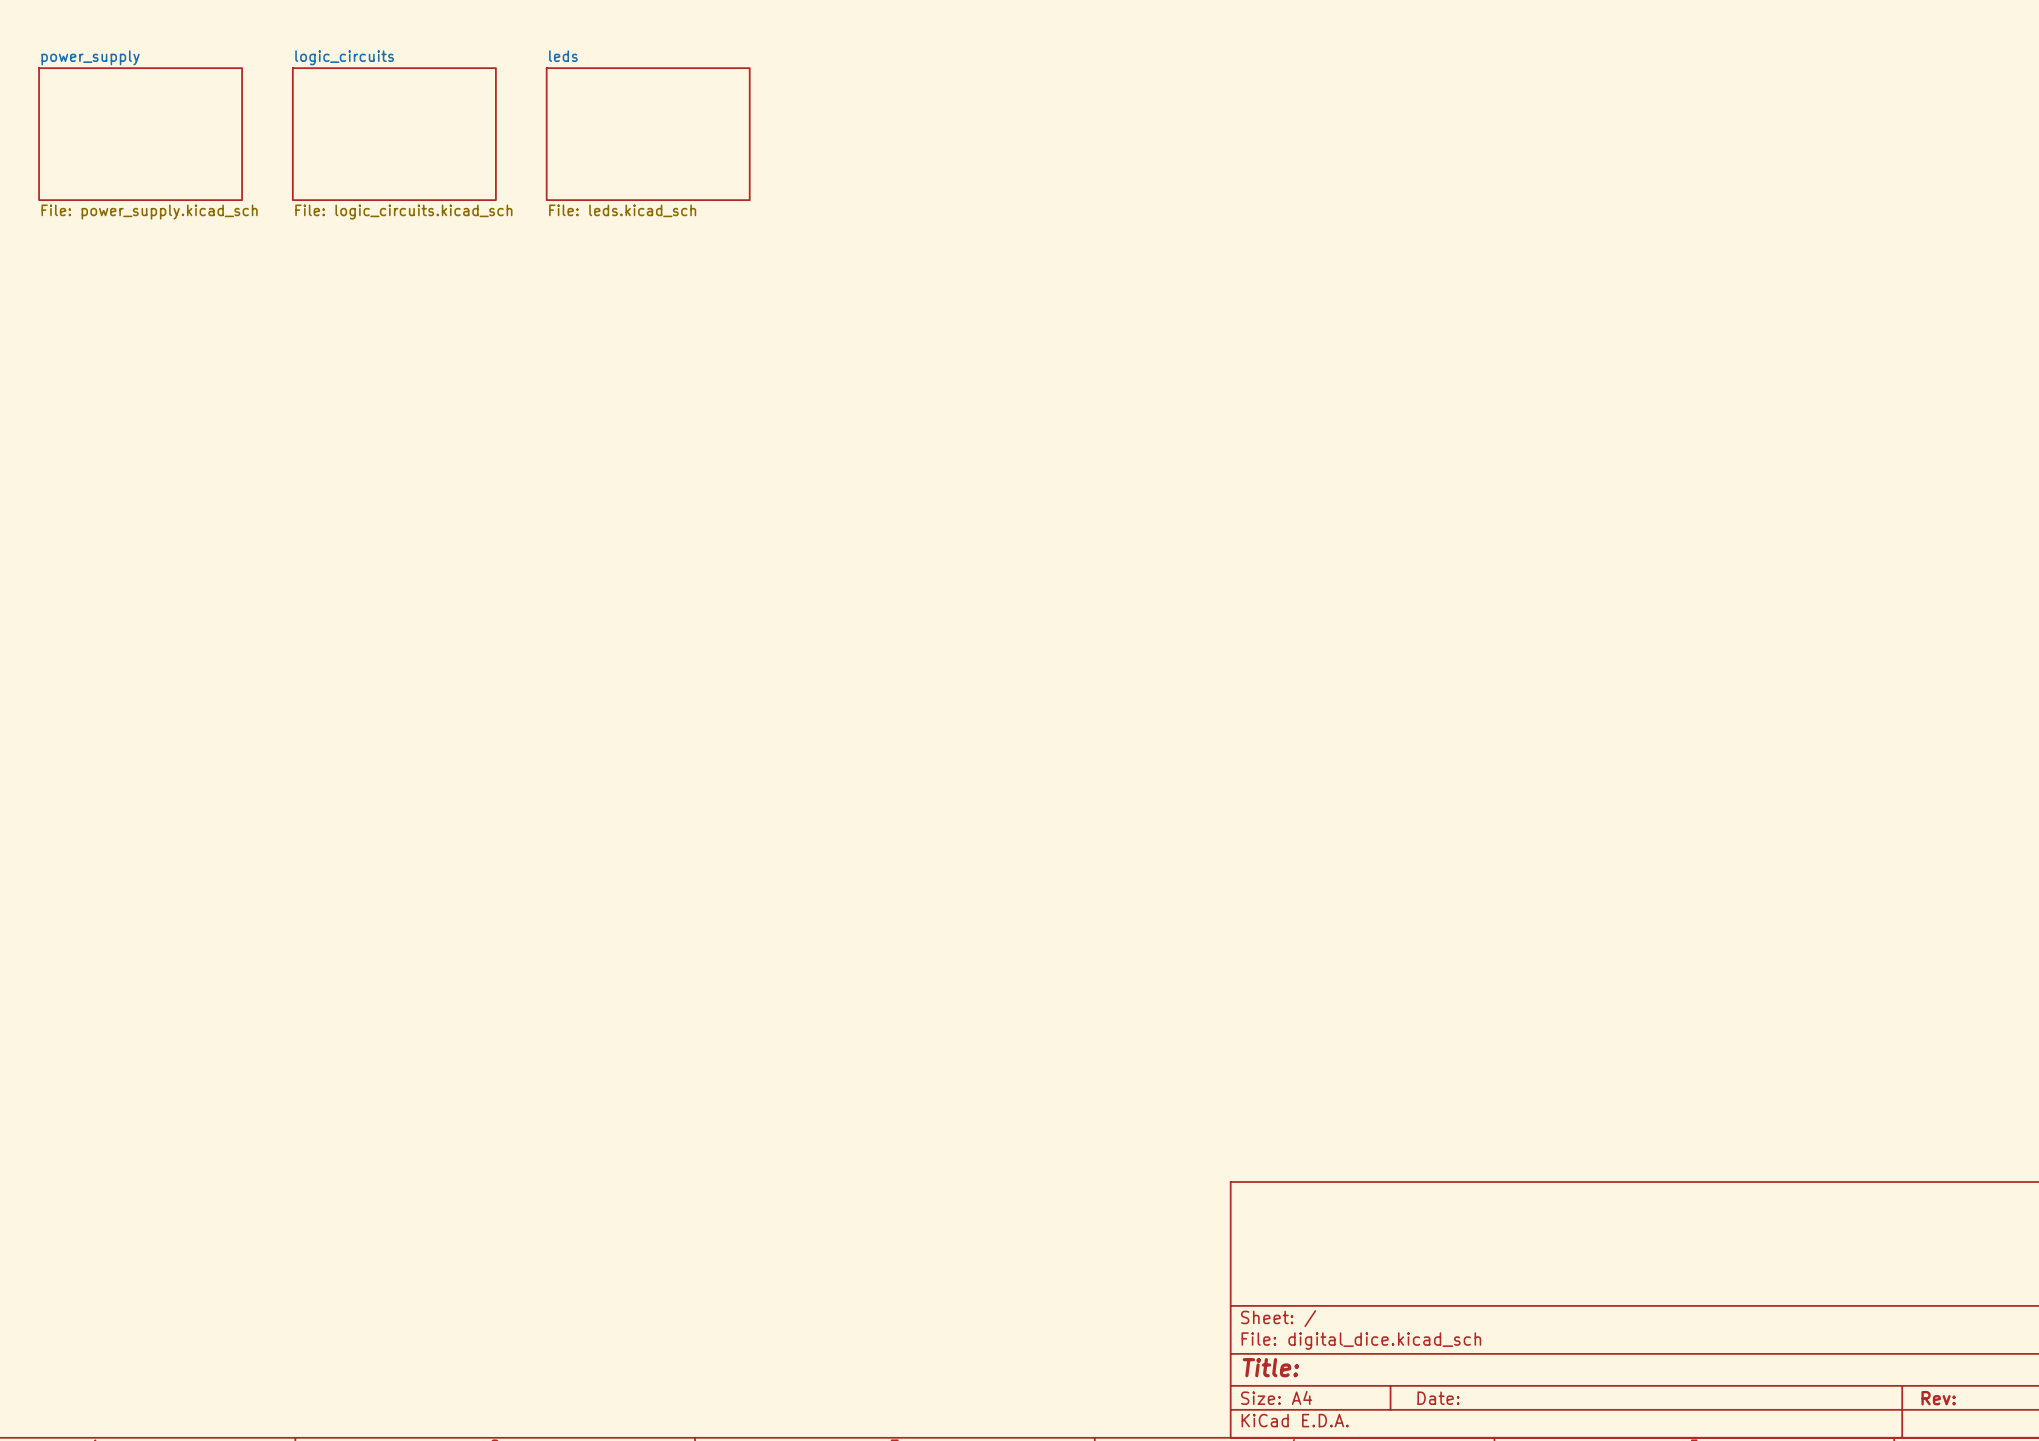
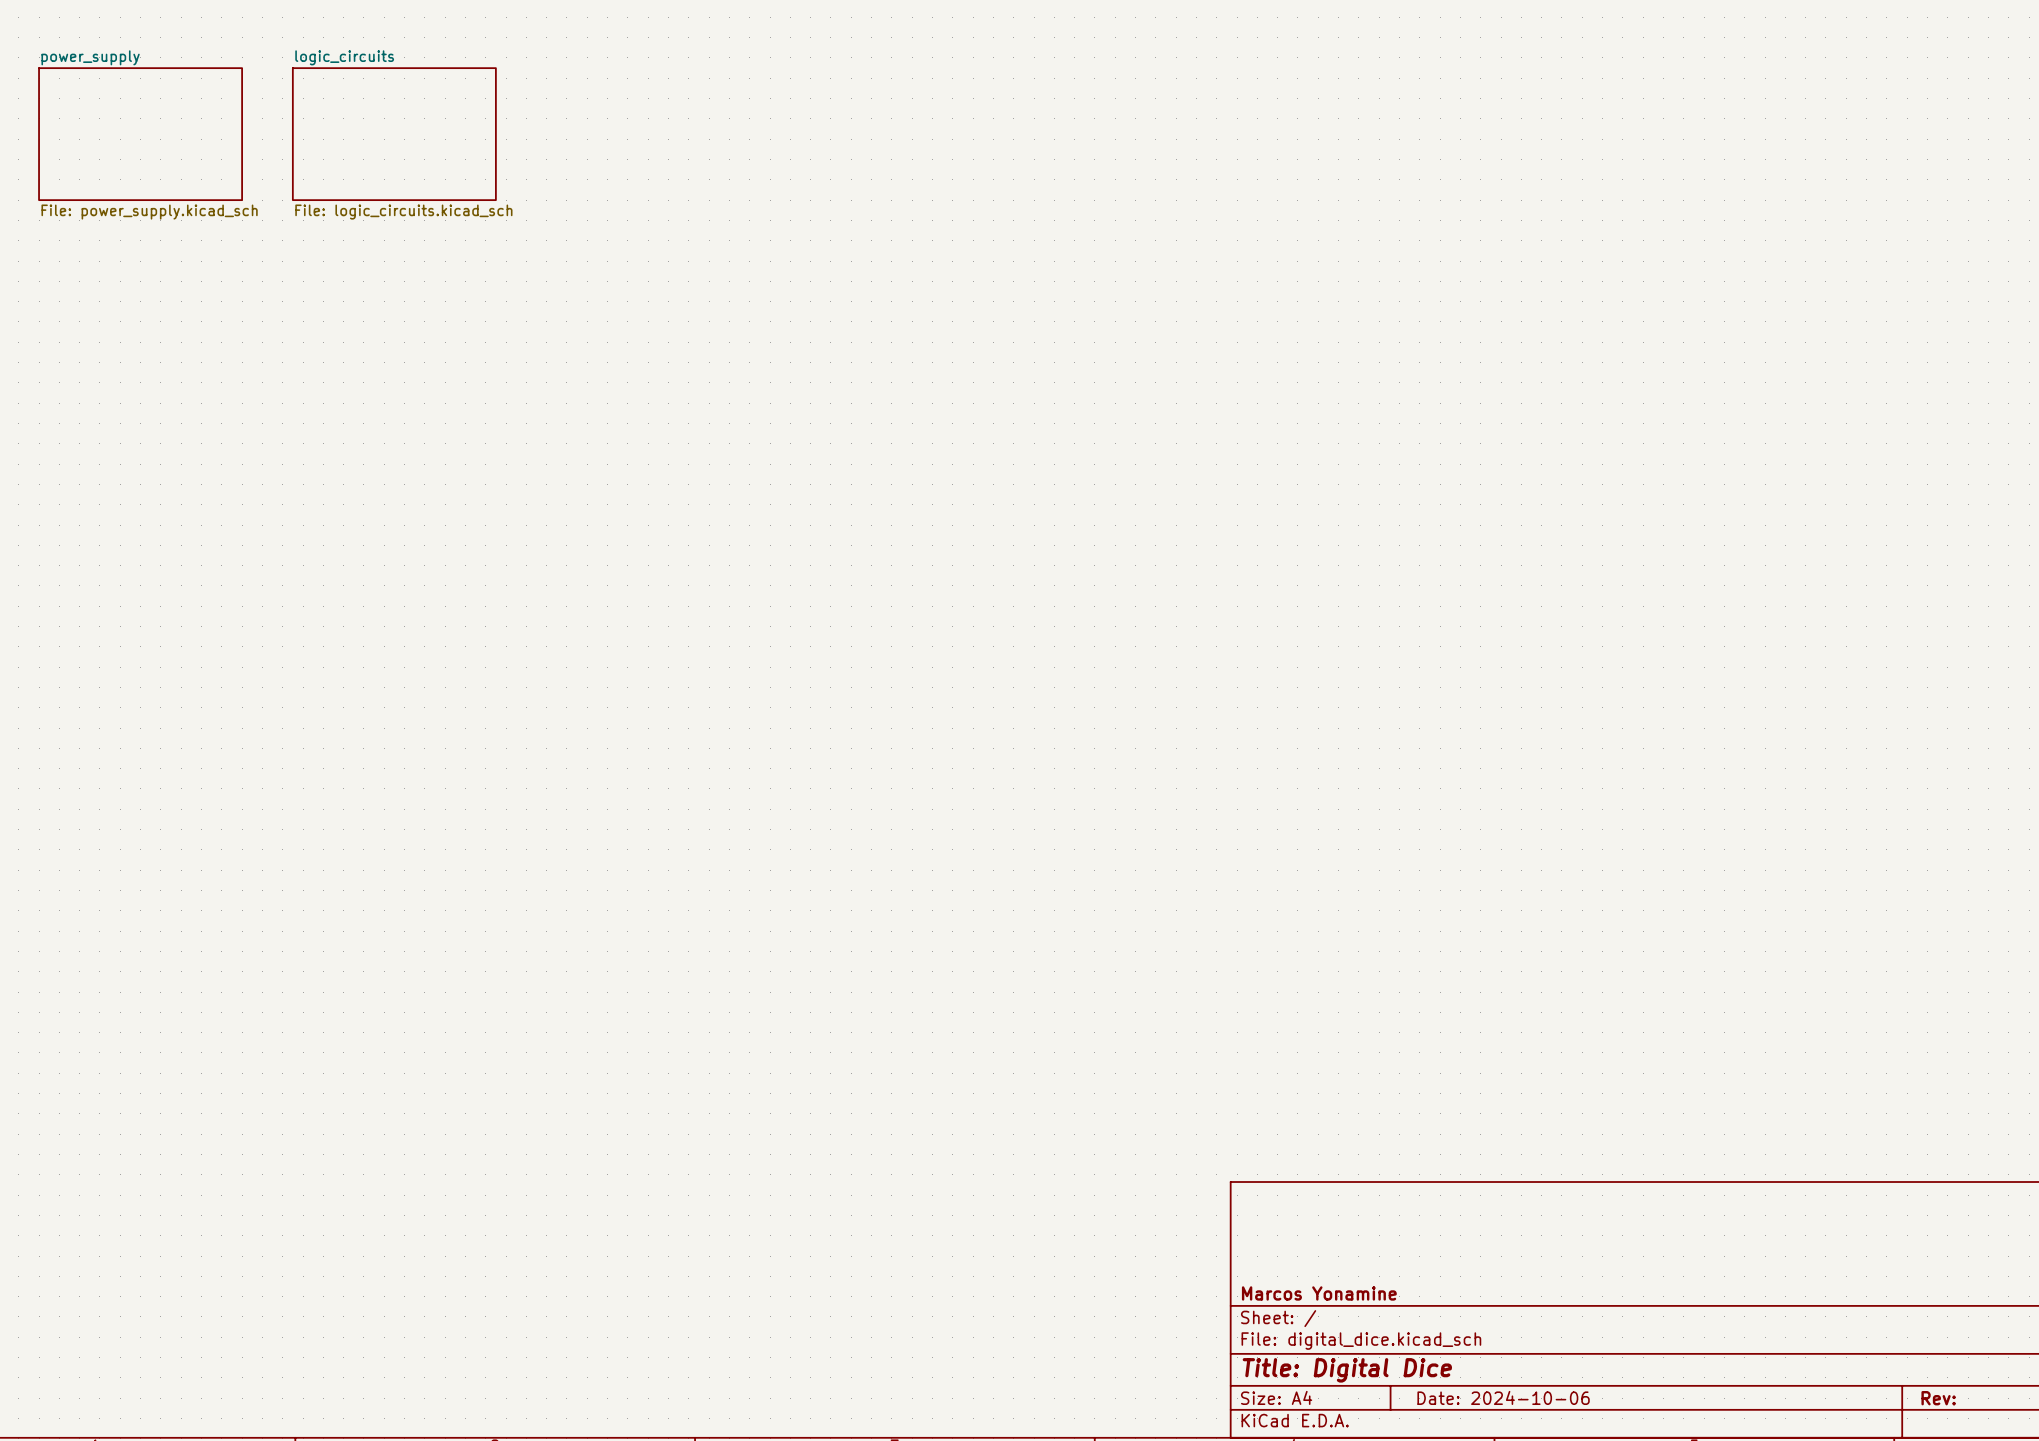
sheet leds: File: leds.kicad_sch (648, 134) -> none
title block: none -> Marcos Yonamine (1319, 1293)
title block: Title: (1270, 1367) -> Title: Digital Dice (1347, 1370)
title block: Date: (1438, 1398) -> Date: 2024-10-06 (1503, 1397)

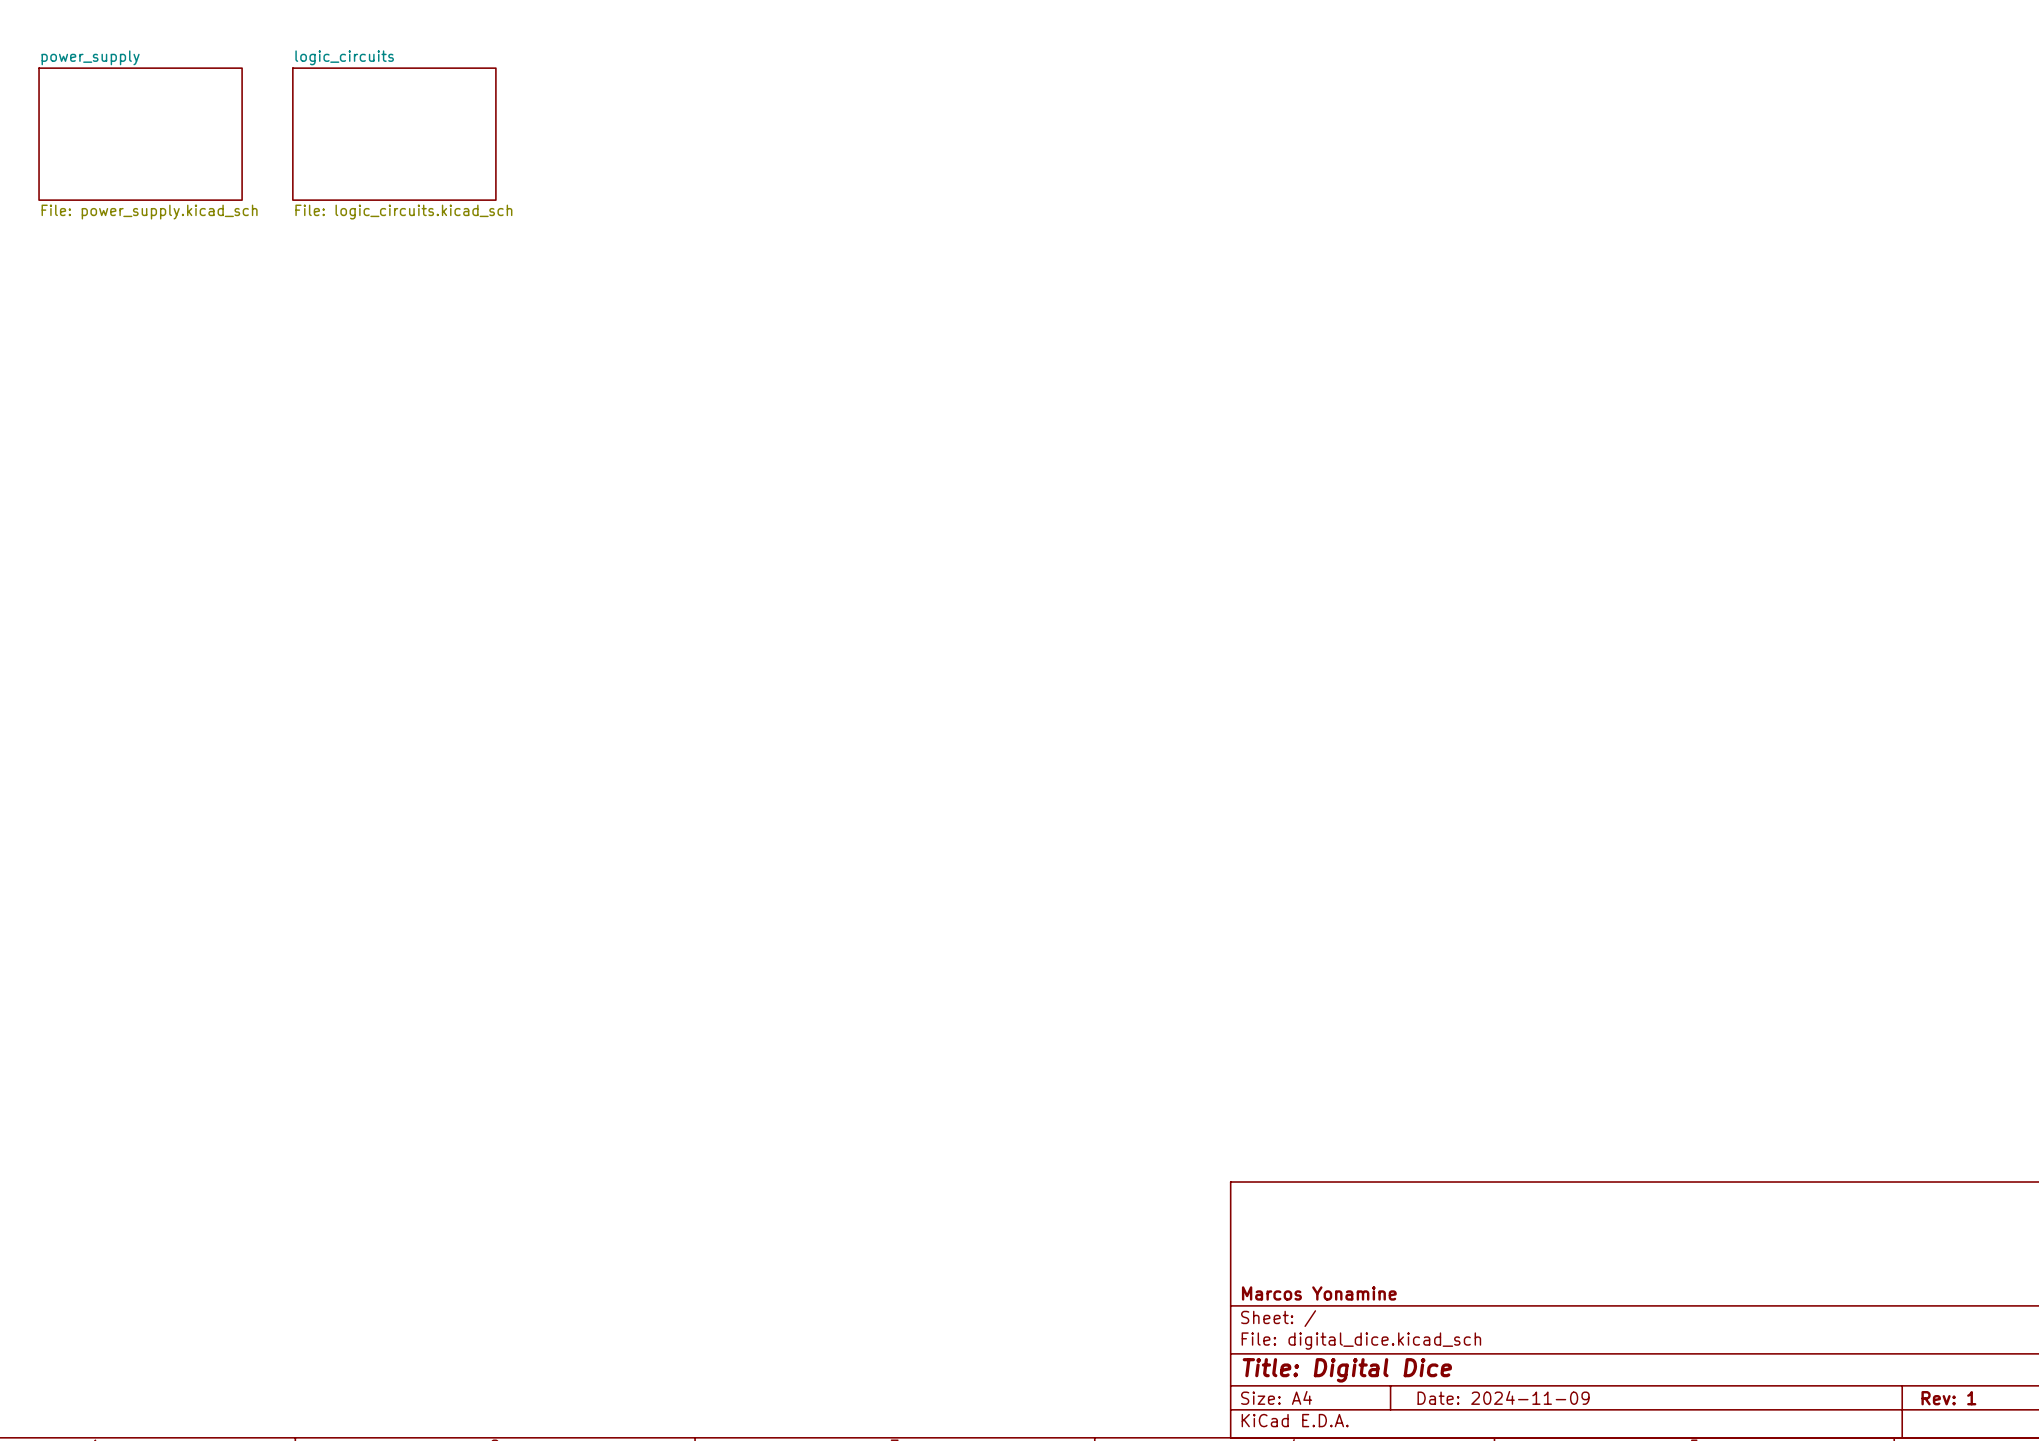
title block: Date: 2024-10-06 (1503, 1397) -> Date: 2024-11-09 (1503, 1397)
title block: Rev: (1938, 1398) -> Rev: 1 (1948, 1398)

